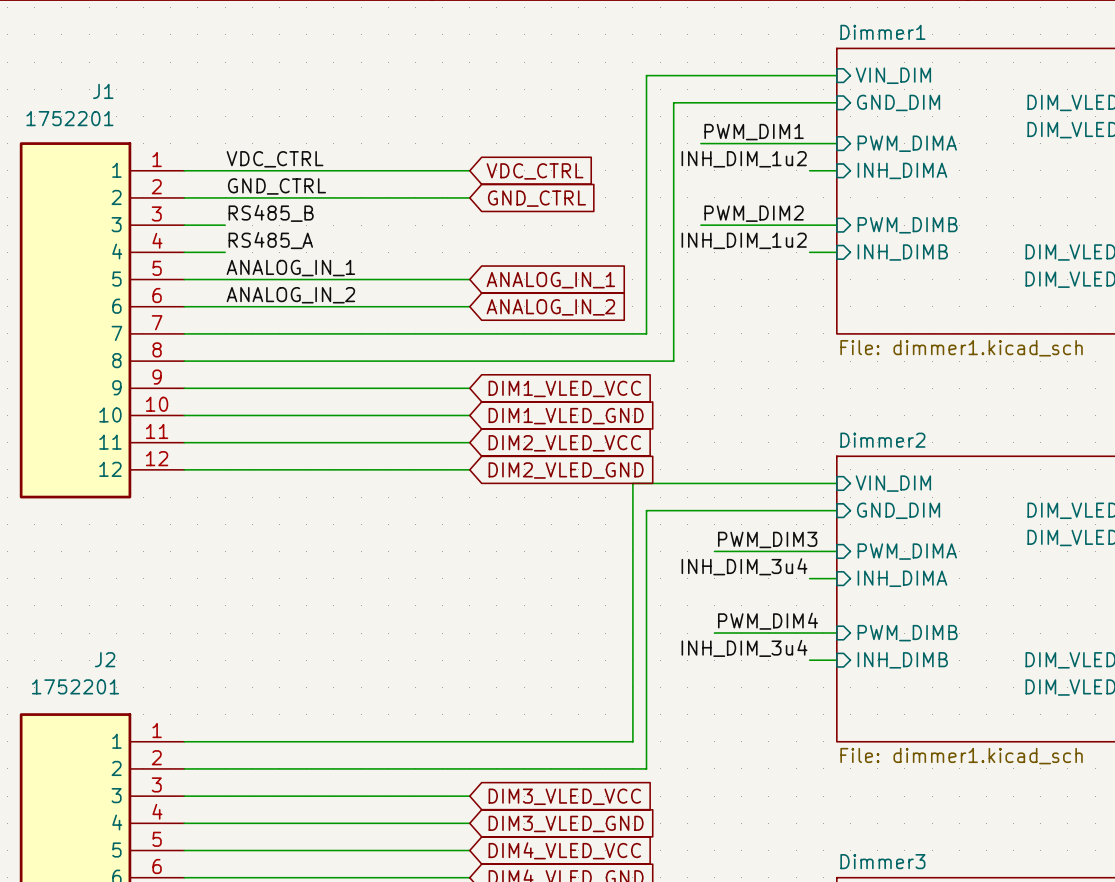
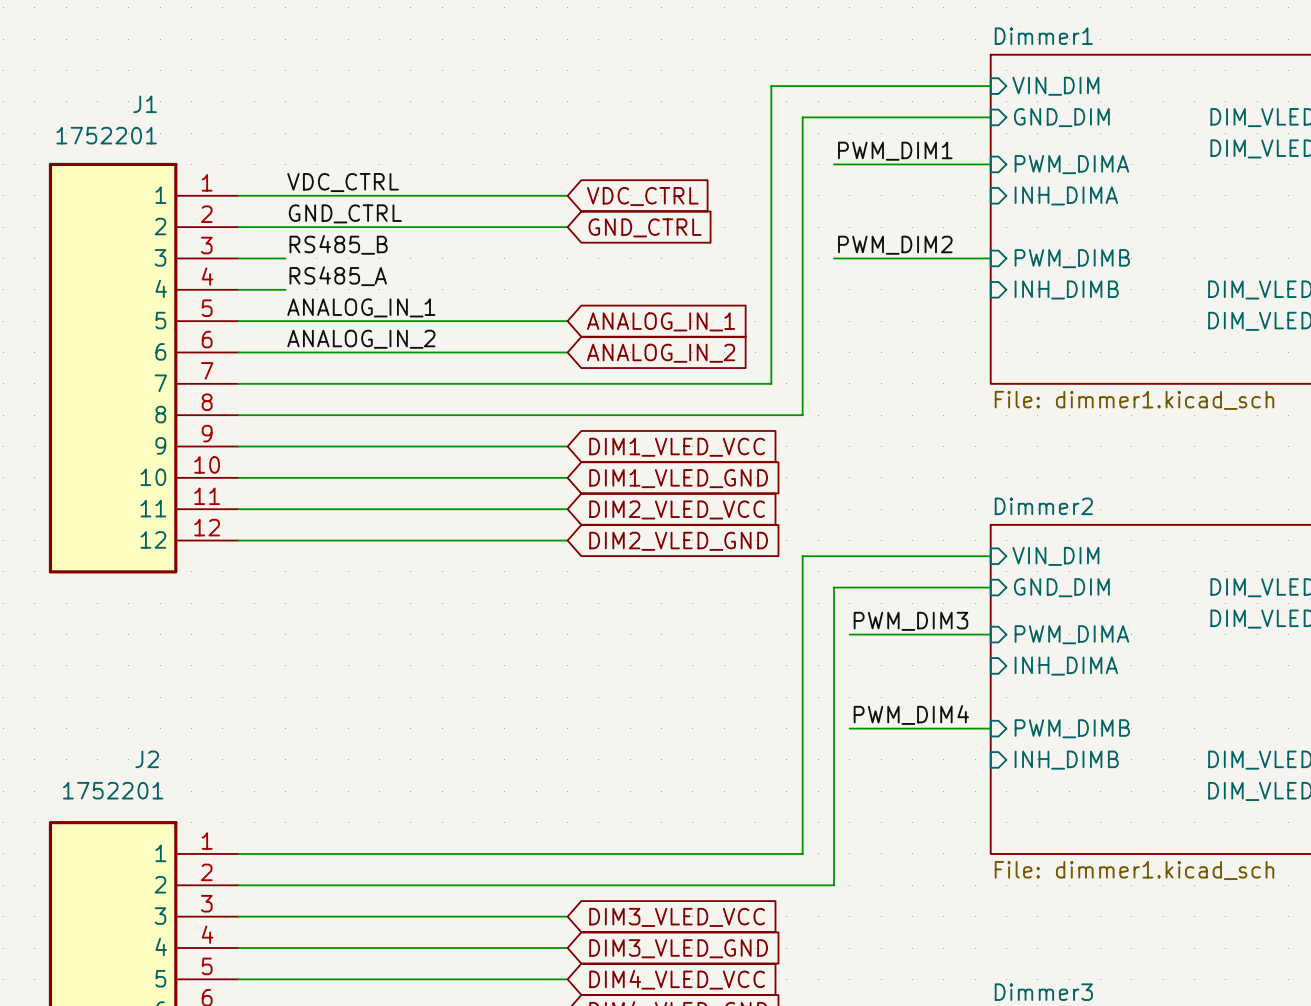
label: INH_DIM_1u2 (744, 159) -> none
wire: (809, 170) (836, 170) -> none
label: INH_DIM_1u2 (744, 240) -> none
wire: (809, 252) (836, 252) -> none
wire: (673, 483) (632, 483) (632, 741) -> (802, 556) (802, 853) (755, 853)
wire: (700, 510) (646, 510) (646, 768) -> (834, 587) (834, 885) (771, 885)
label: INH_DIM_3u4 (744, 566) -> none
wire: (809, 578) (836, 578) -> none
label: INH_DIM_3u4 (744, 648) -> none
wire: (809, 660) (836, 660) -> none

